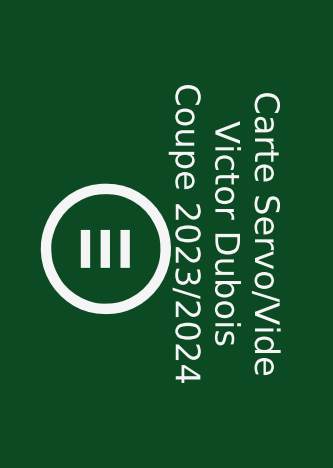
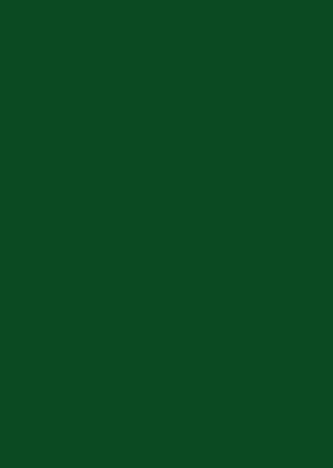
drawing: [40, 183, 171, 315] -> none
text: Victor Dubois (227, 233) -> none
text: Coupe 2023/2024 (184, 234) -> none
text: Carte Servo/Vide (266, 234) -> none

